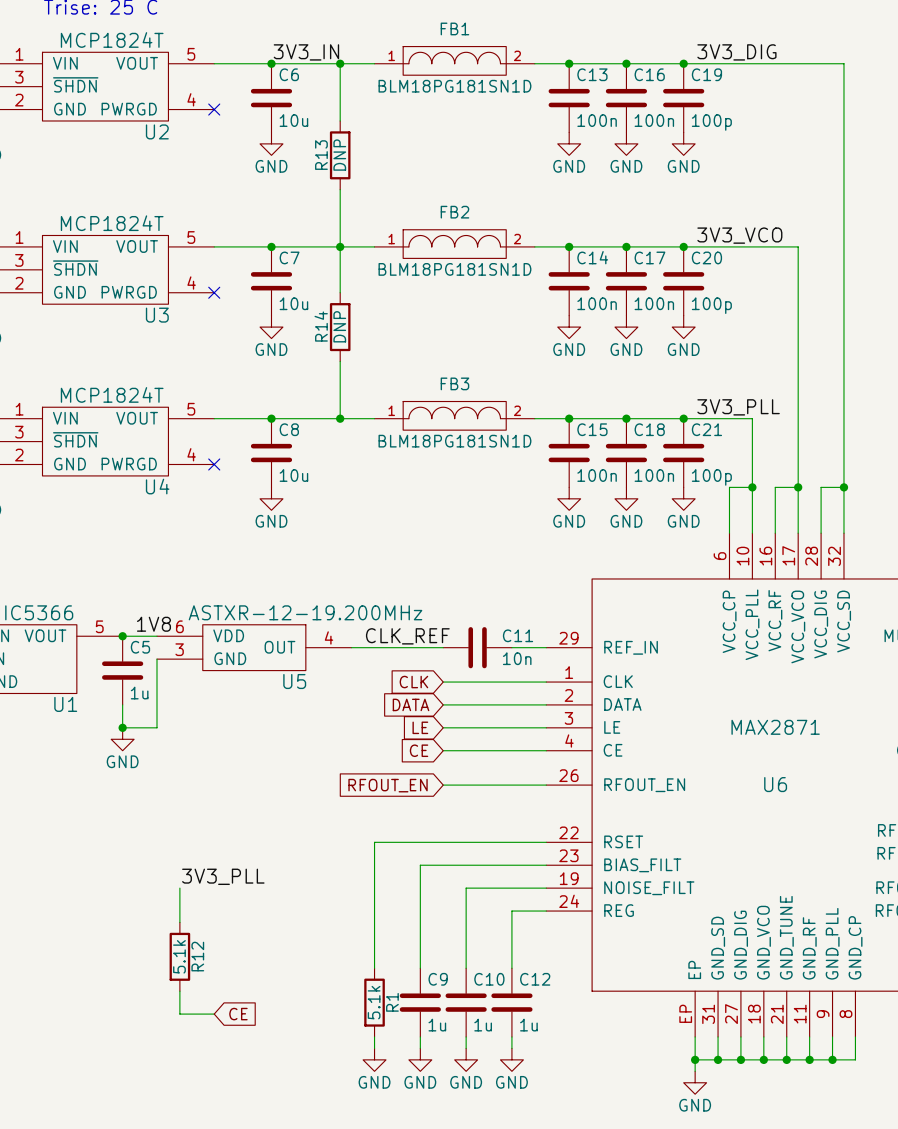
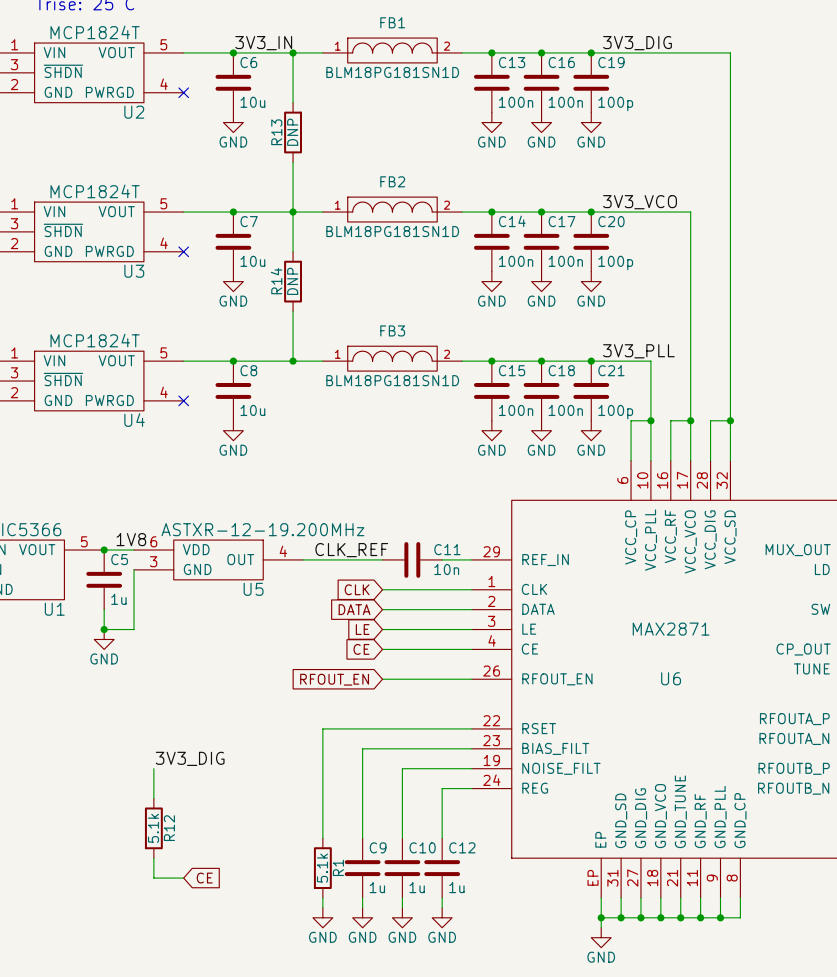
label: 3V3_PLL (223, 876) -> 3V3_DIG (190, 758)

